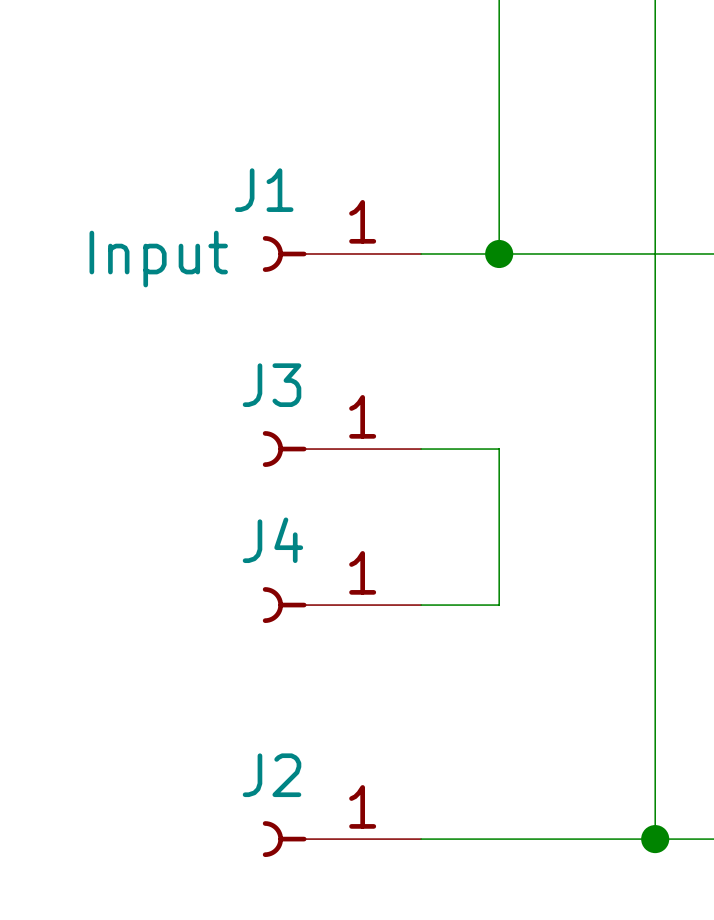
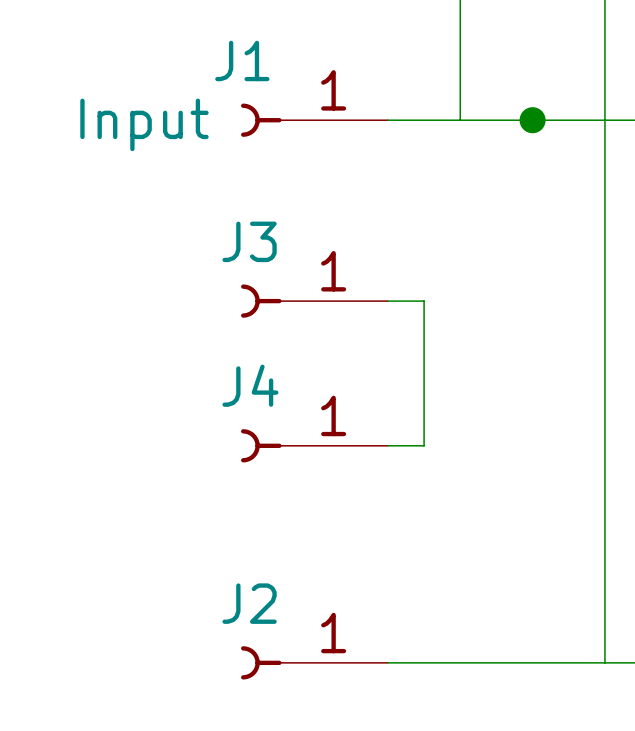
junction position: (499, 253) -> (532, 120)
wire: (460, 449) (499, 449) (499, 605) (460, 605) -> (424, 301) (424, 445)
junction: (655, 839) -> none

